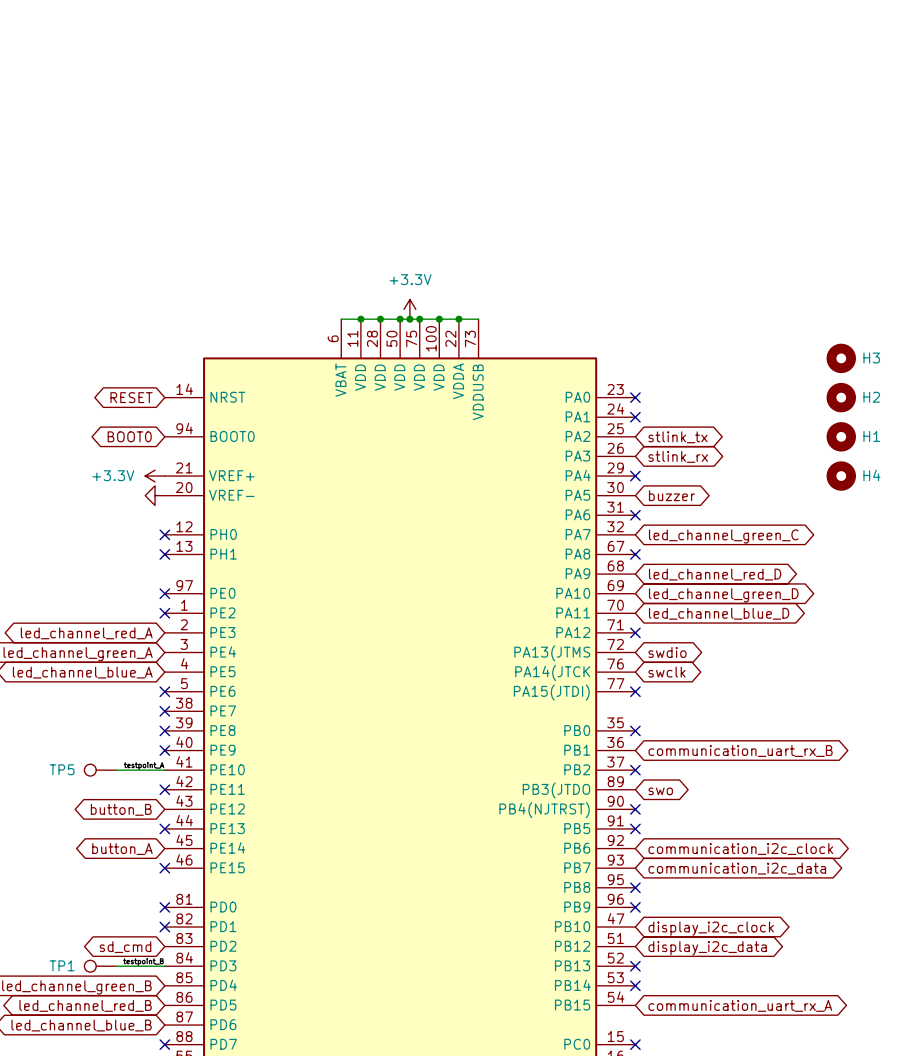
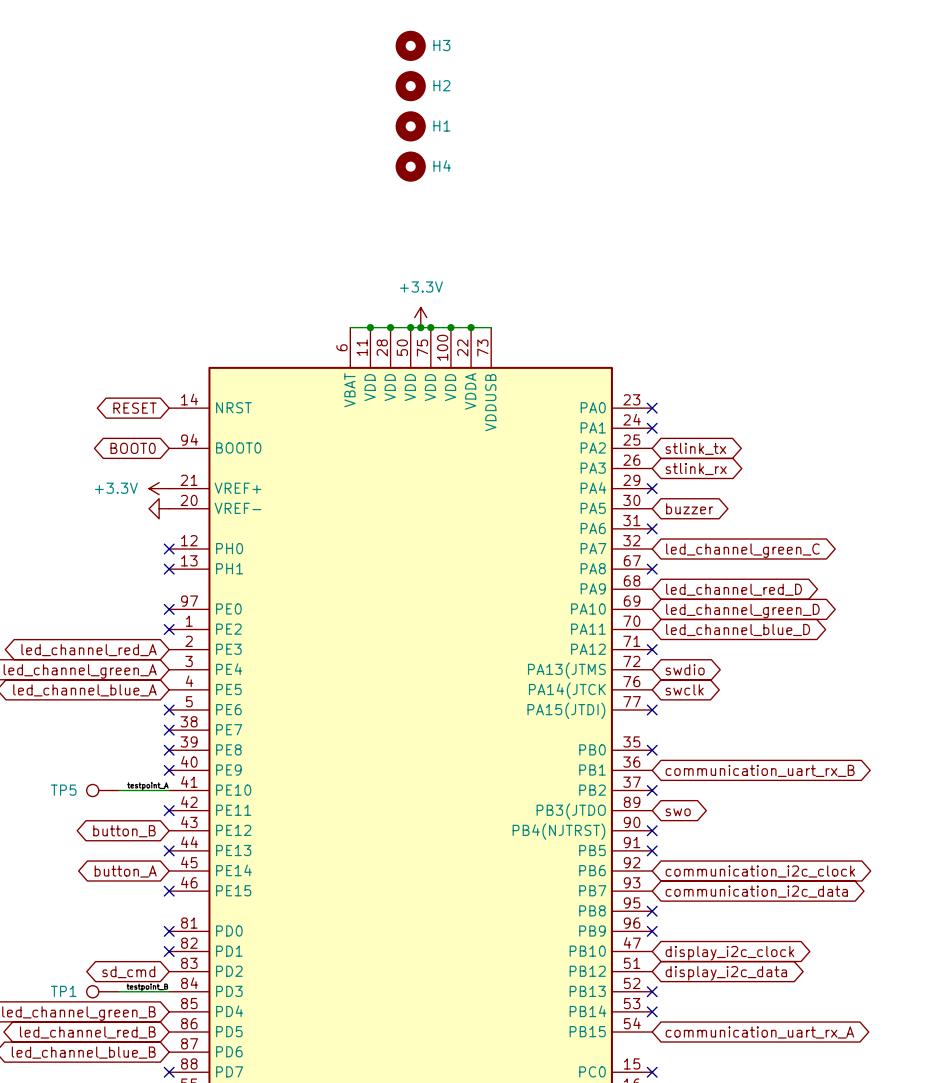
H3 position: (841, 358) -> (410, 45)
H2 position: (841, 397) -> (410, 86)
H1 position: (841, 436) -> (410, 126)
H4 position: (841, 476) -> (410, 166)

